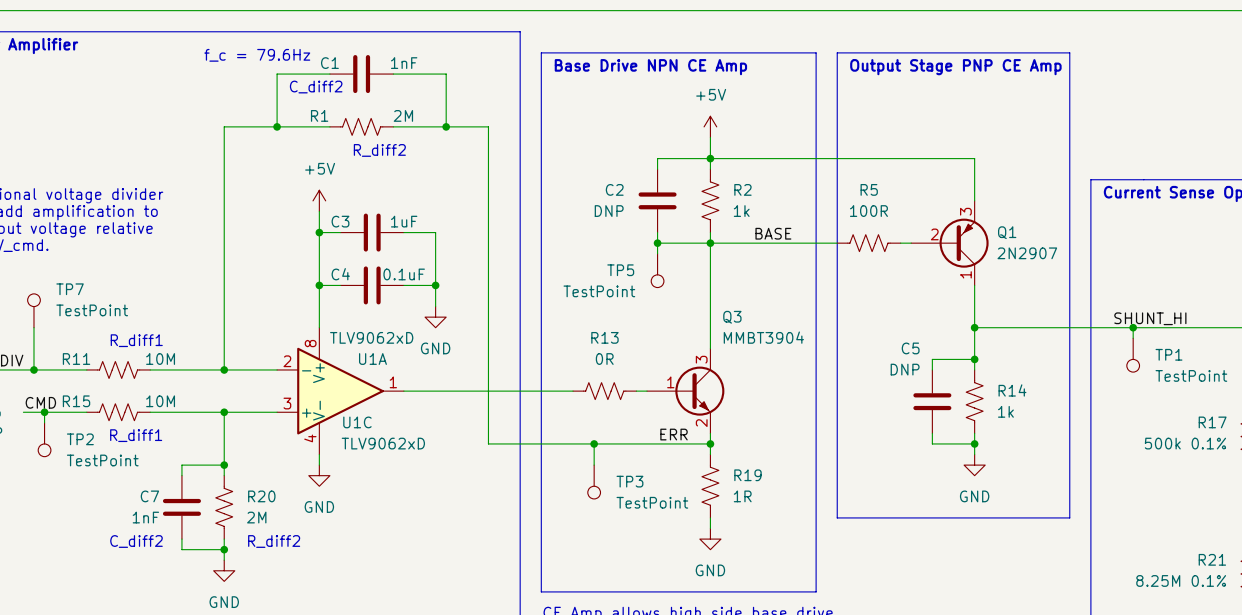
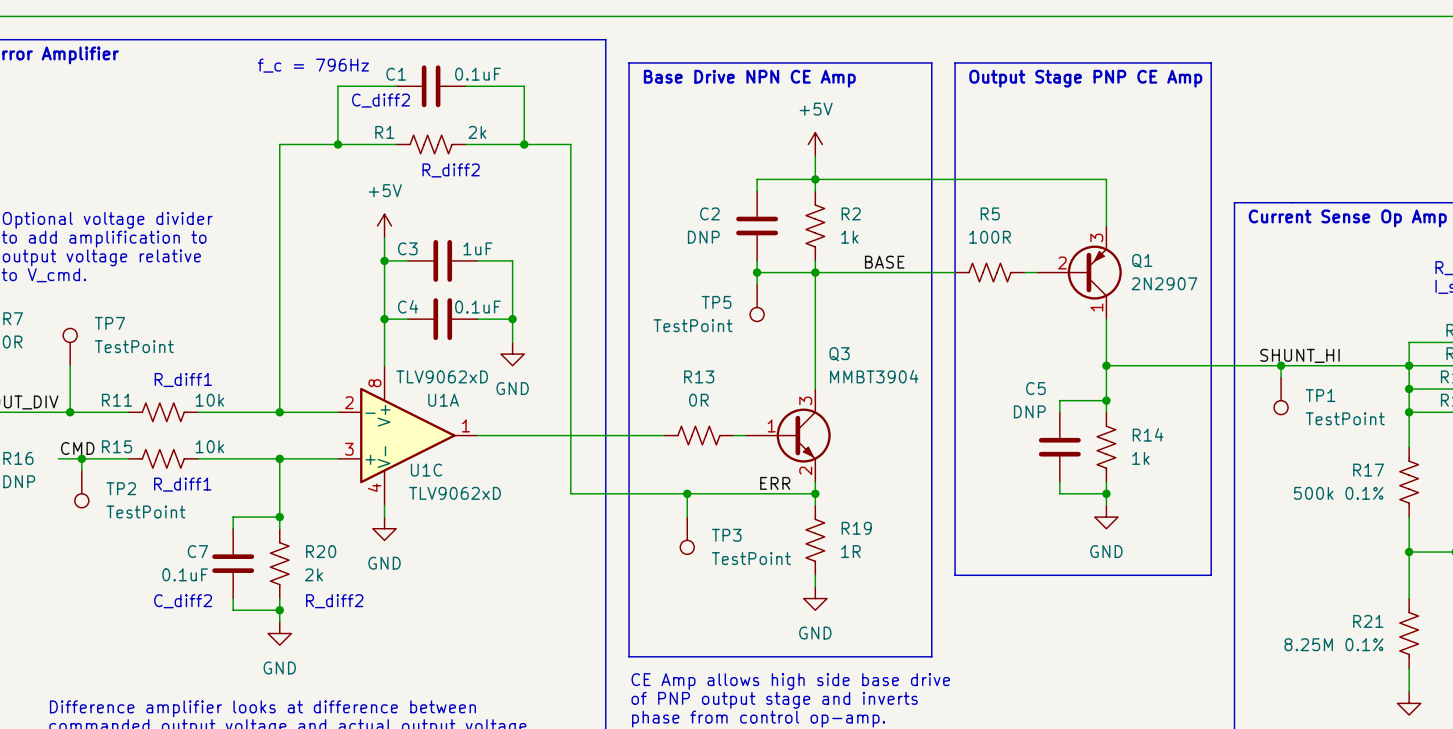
text: f_c = 79.6Hz (257, 55) -> f_c = 796Hz (313, 65)
C1 value: 1nF (404, 63) -> 0.1uF (477, 74)
R1 value: 2M (403, 115) -> 2k (477, 132)
R11 value: 10M (160, 359) -> 10k (209, 400)
R15 value: 10M (160, 401) -> 10k (209, 446)
C7 value: 1nF (145, 517) -> 0.1uF (185, 574)
R20 value: 2M (256, 517) -> 2k (313, 574)

